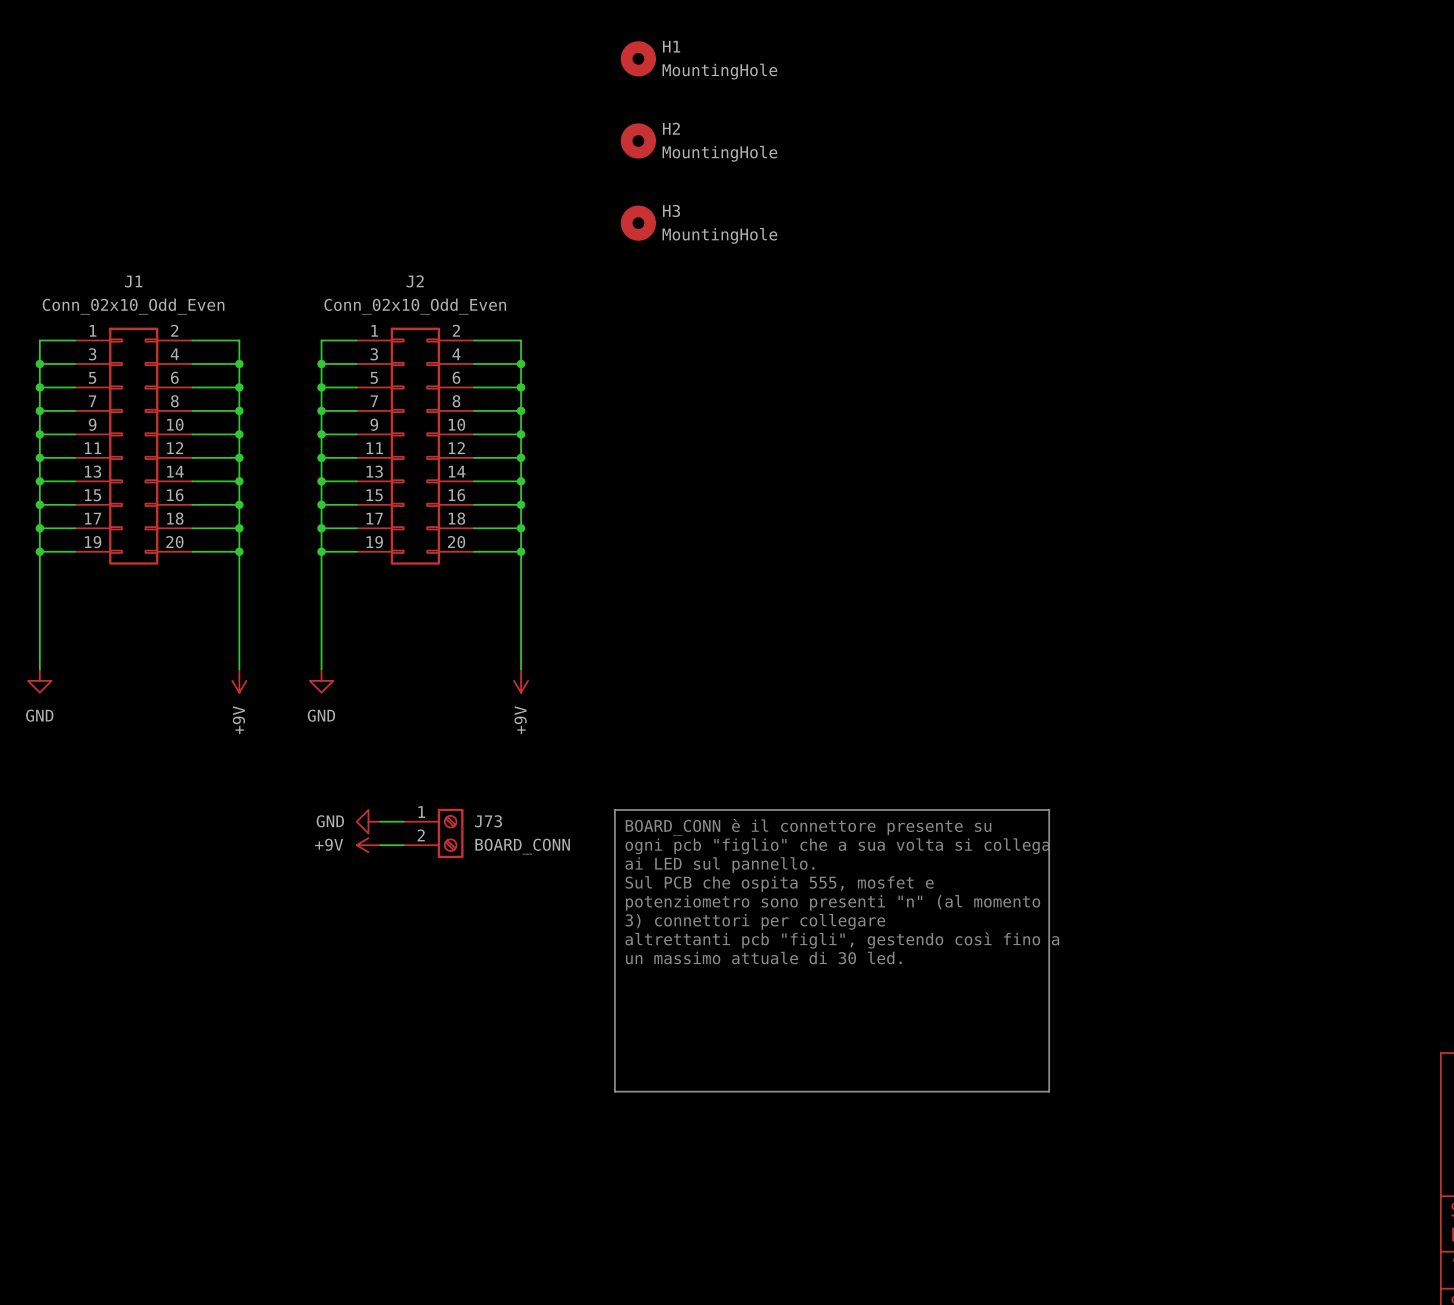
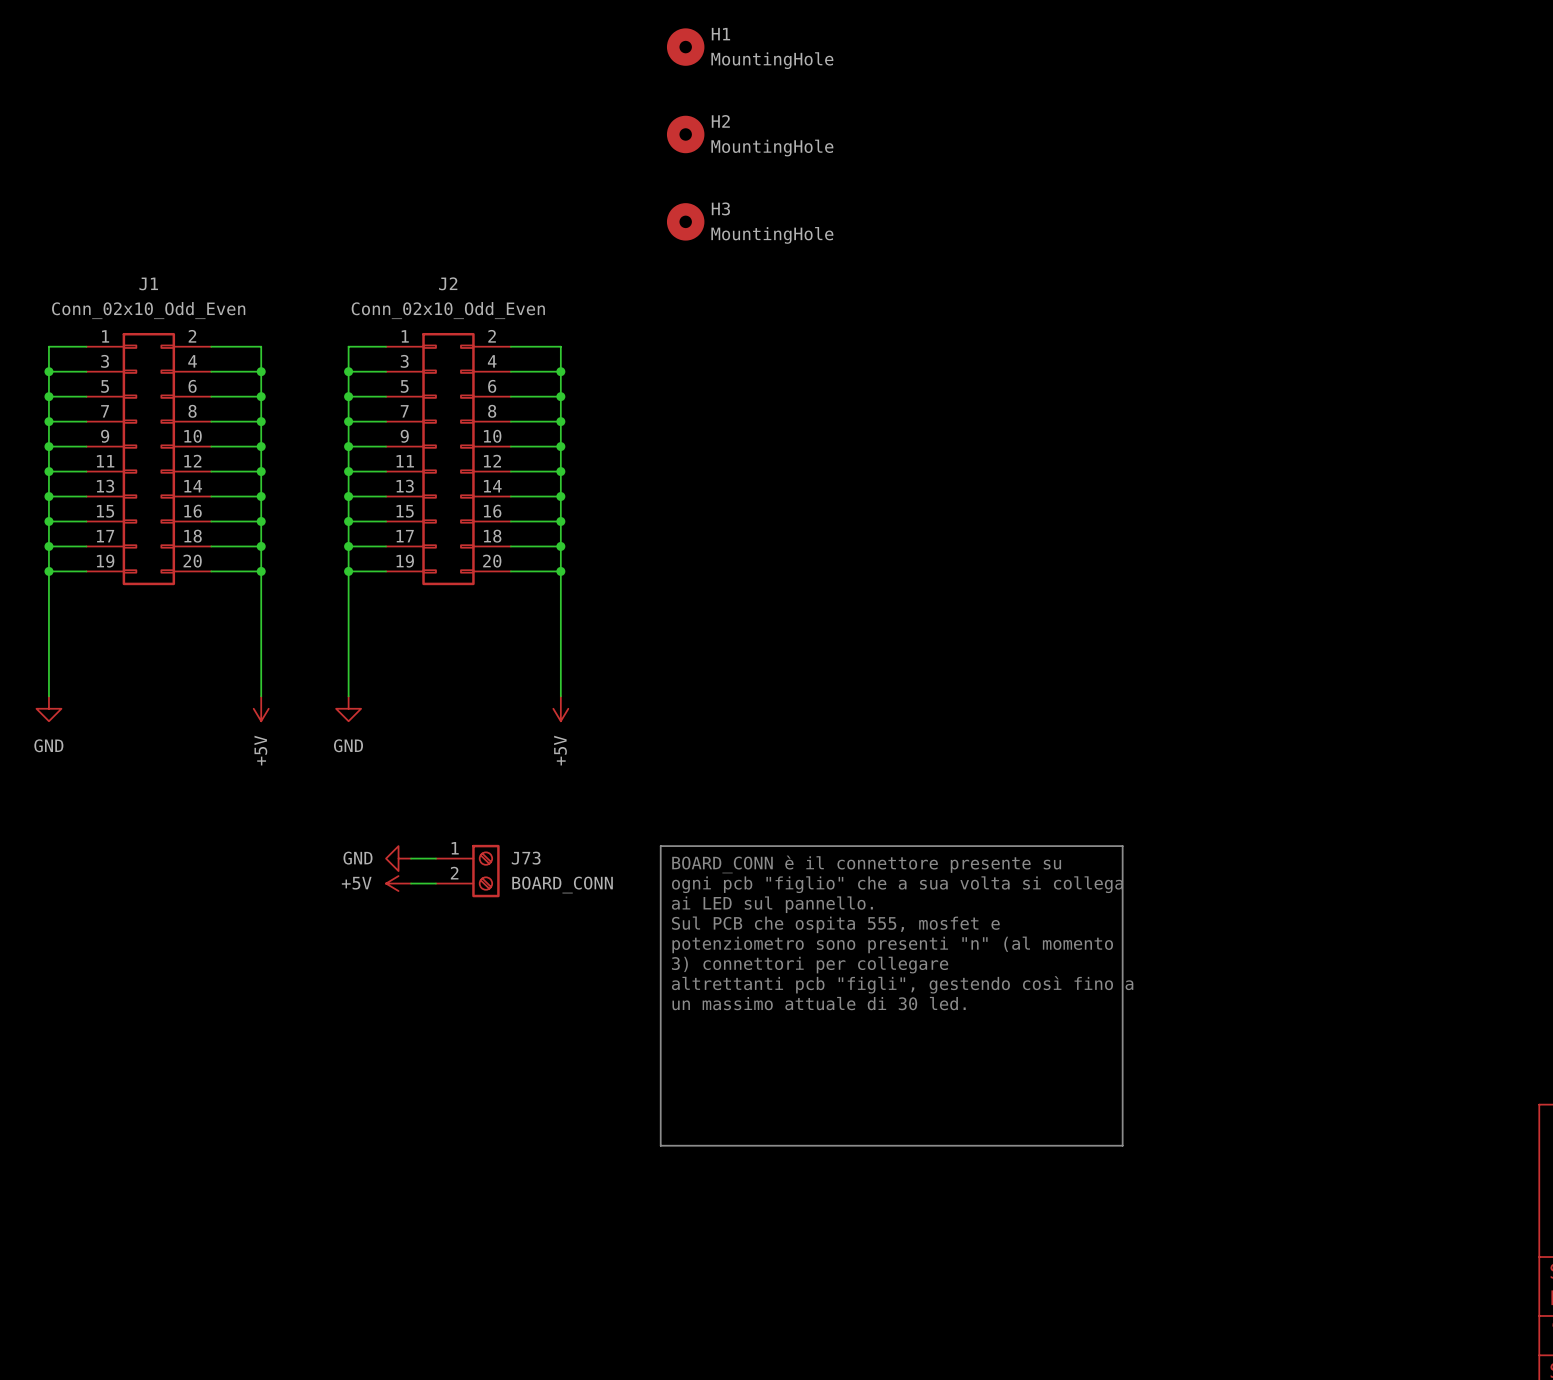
power symbol: +9V (239, 680) -> +5V (261, 708)
power symbol: +9V (521, 680) -> +5V (560, 708)
power symbol: +9V (368, 845) -> +5V (398, 883)

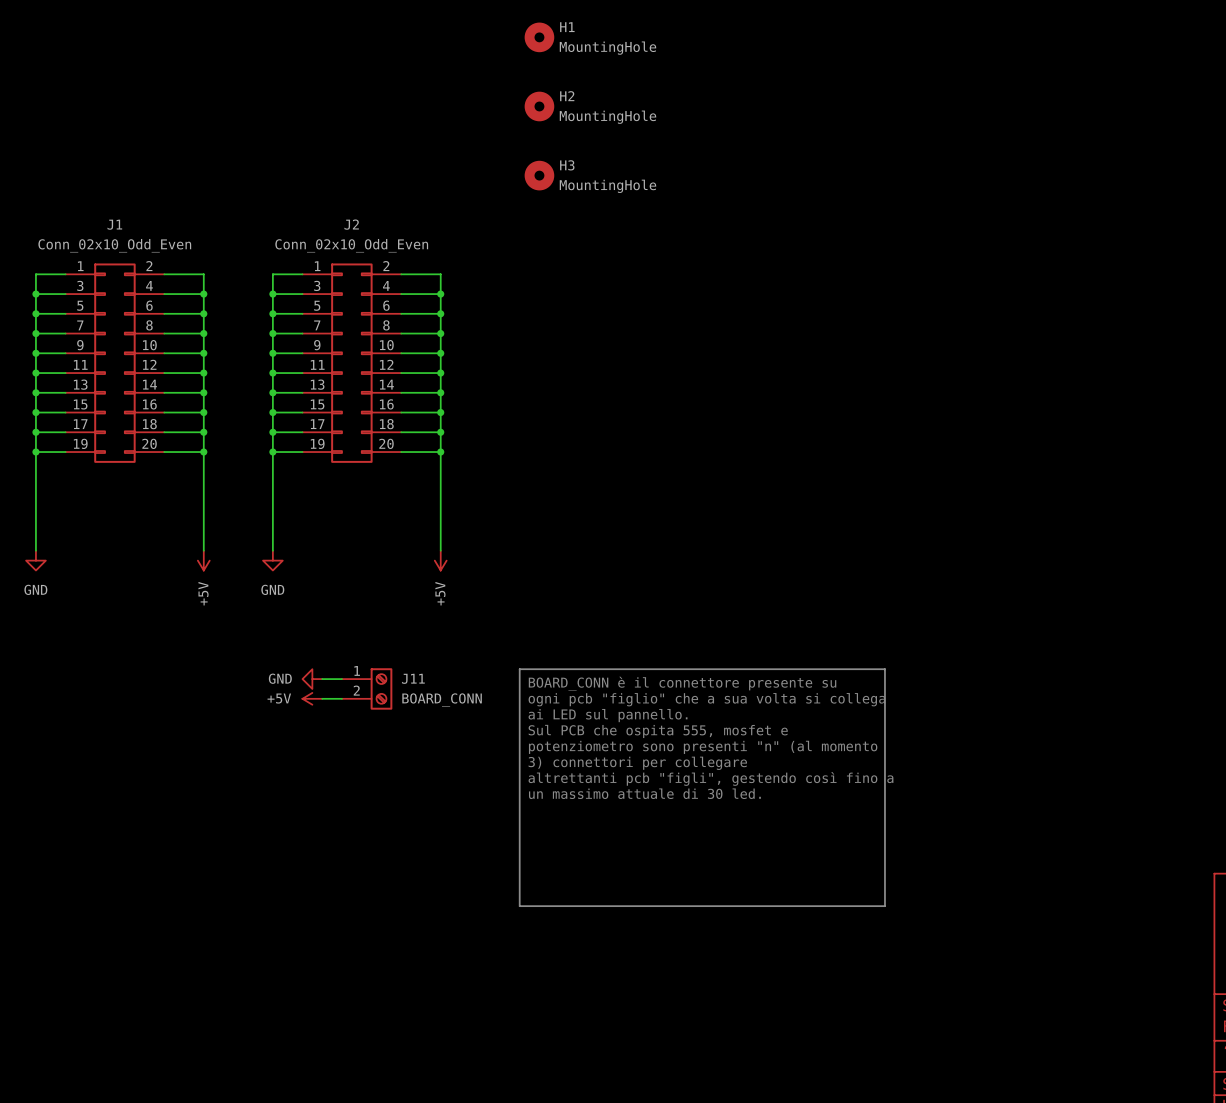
J73 name: J73 (526, 858) -> J11 (413, 678)

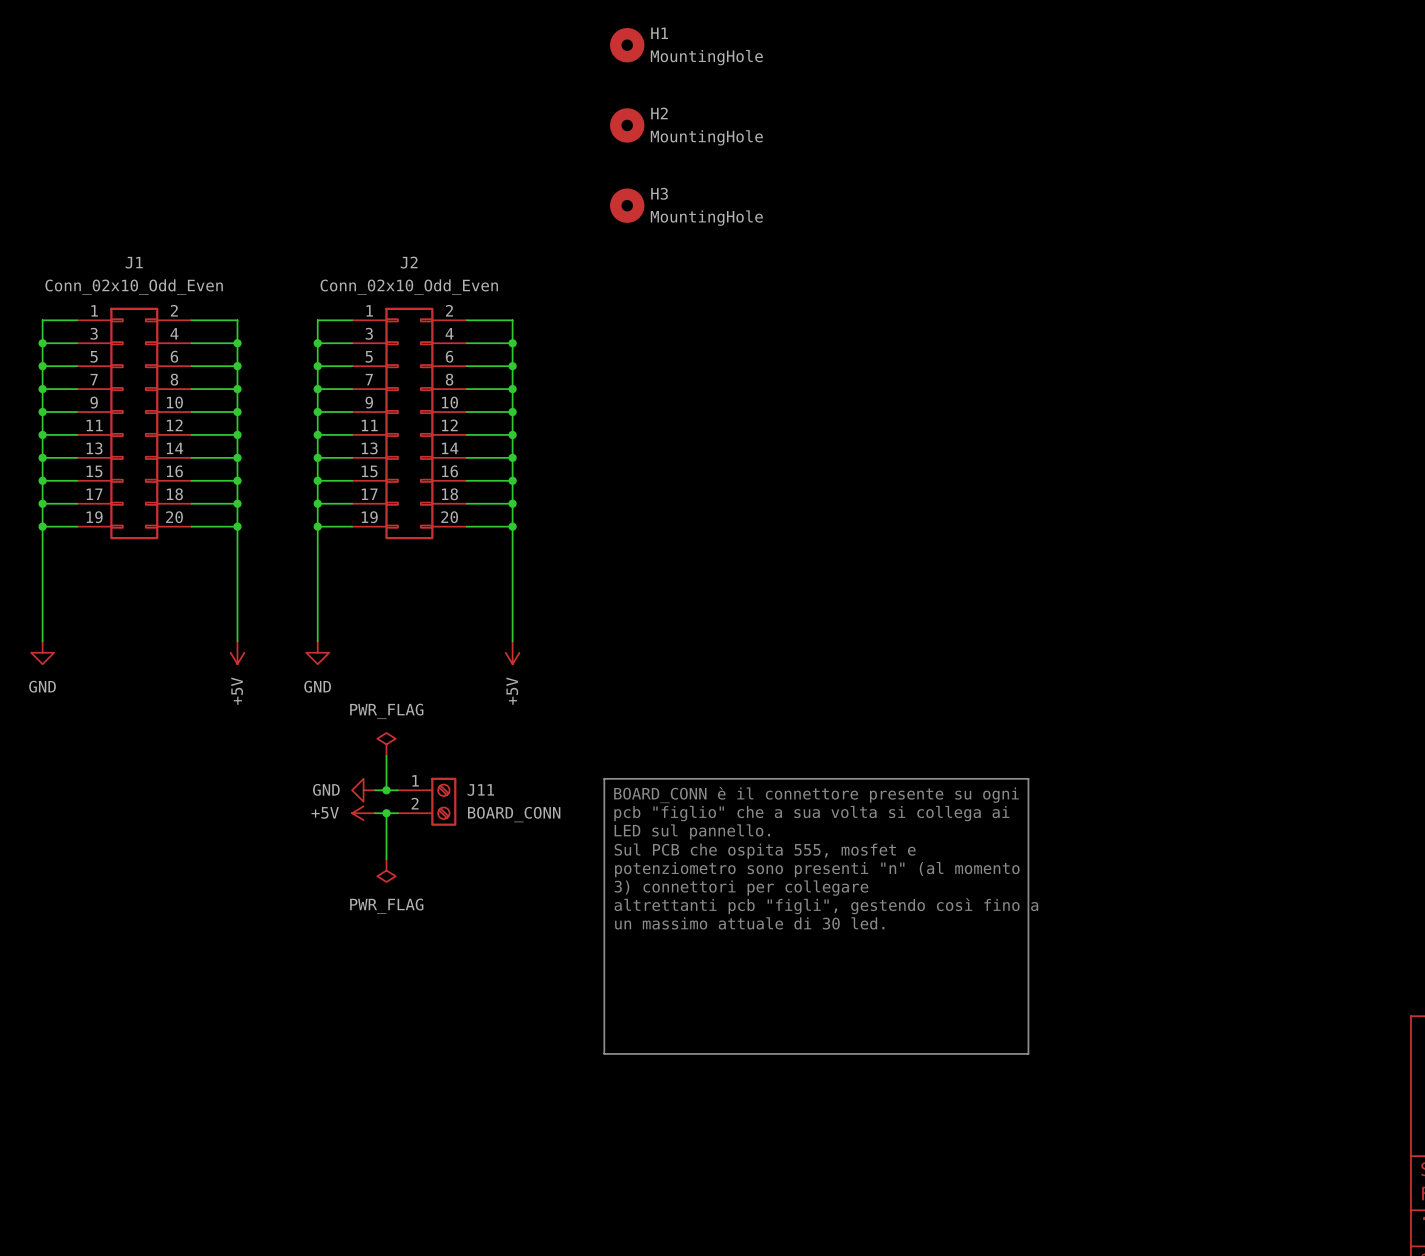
power symbol: none -> PWR_FLAG (386, 744)
wire: none -> (386, 755) (386, 790)
junction: none -> (386, 790)
text: BOARD_CONN è il connettore presente su (682, 683) -> BOARD_CONN è il connettore presente su ogni (816, 795)
wire: none -> (386, 813) (386, 859)
junction: none -> (386, 813)
text: ogni pcb "figlio" che a sua volta si collega (706, 699) -> pcb "figlio" che a sua volta si collega ai (811, 813)
text: ai LED sul pannello. (608, 715) -> LED sul pannello. (692, 831)
power symbol: none -> PWR_FLAG (386, 870)

